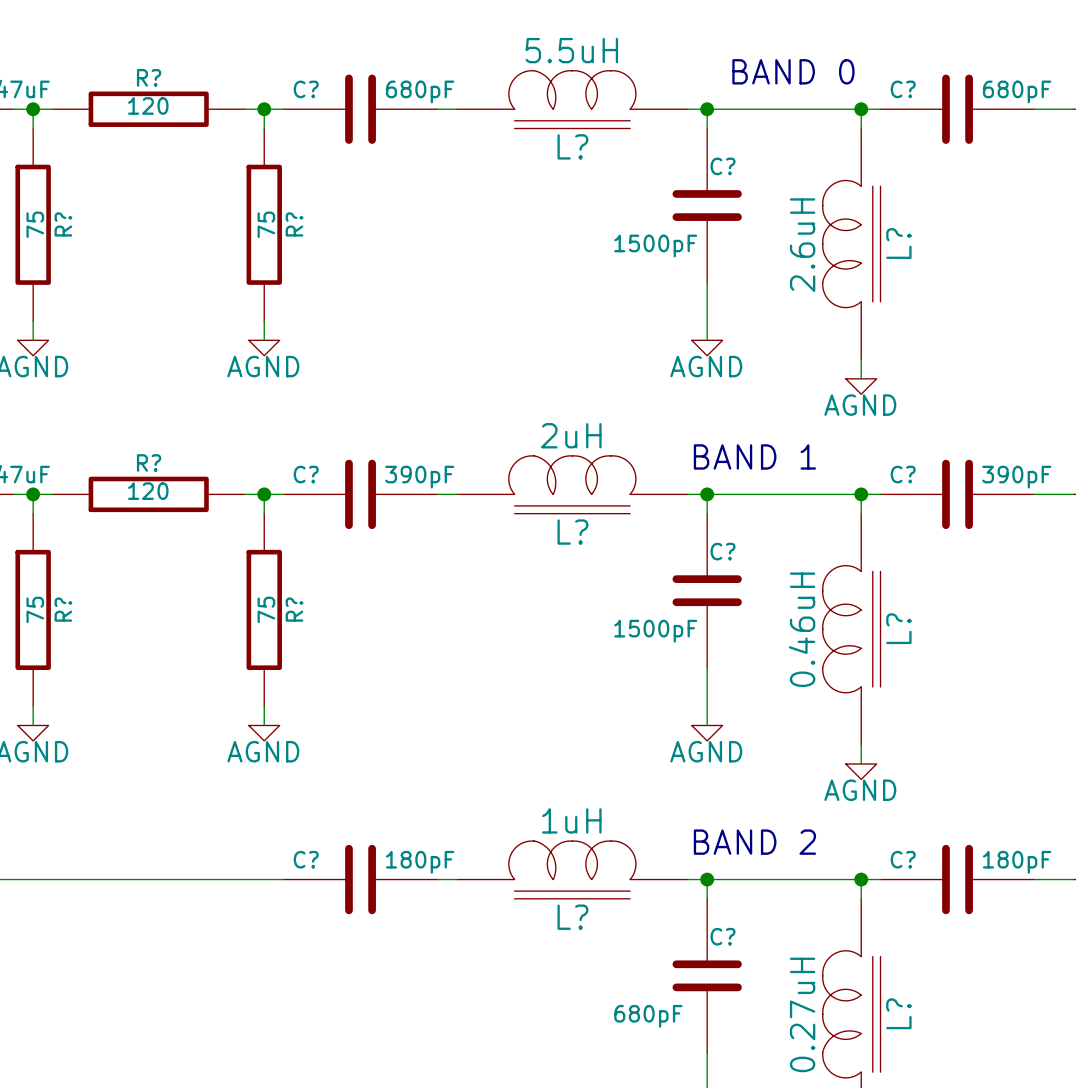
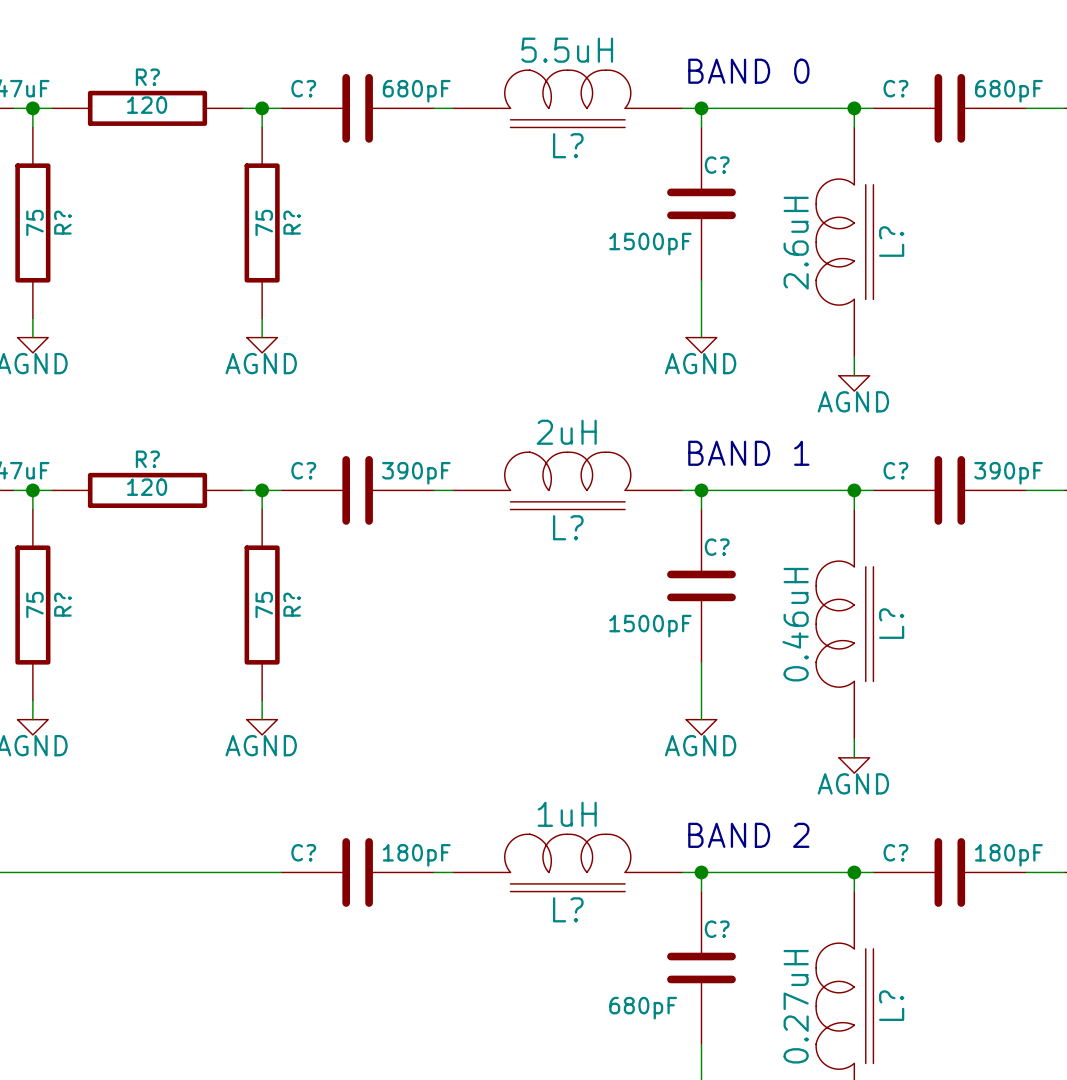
text position: BAND 0 (793, 71) -> BAND 0 (748, 71)

